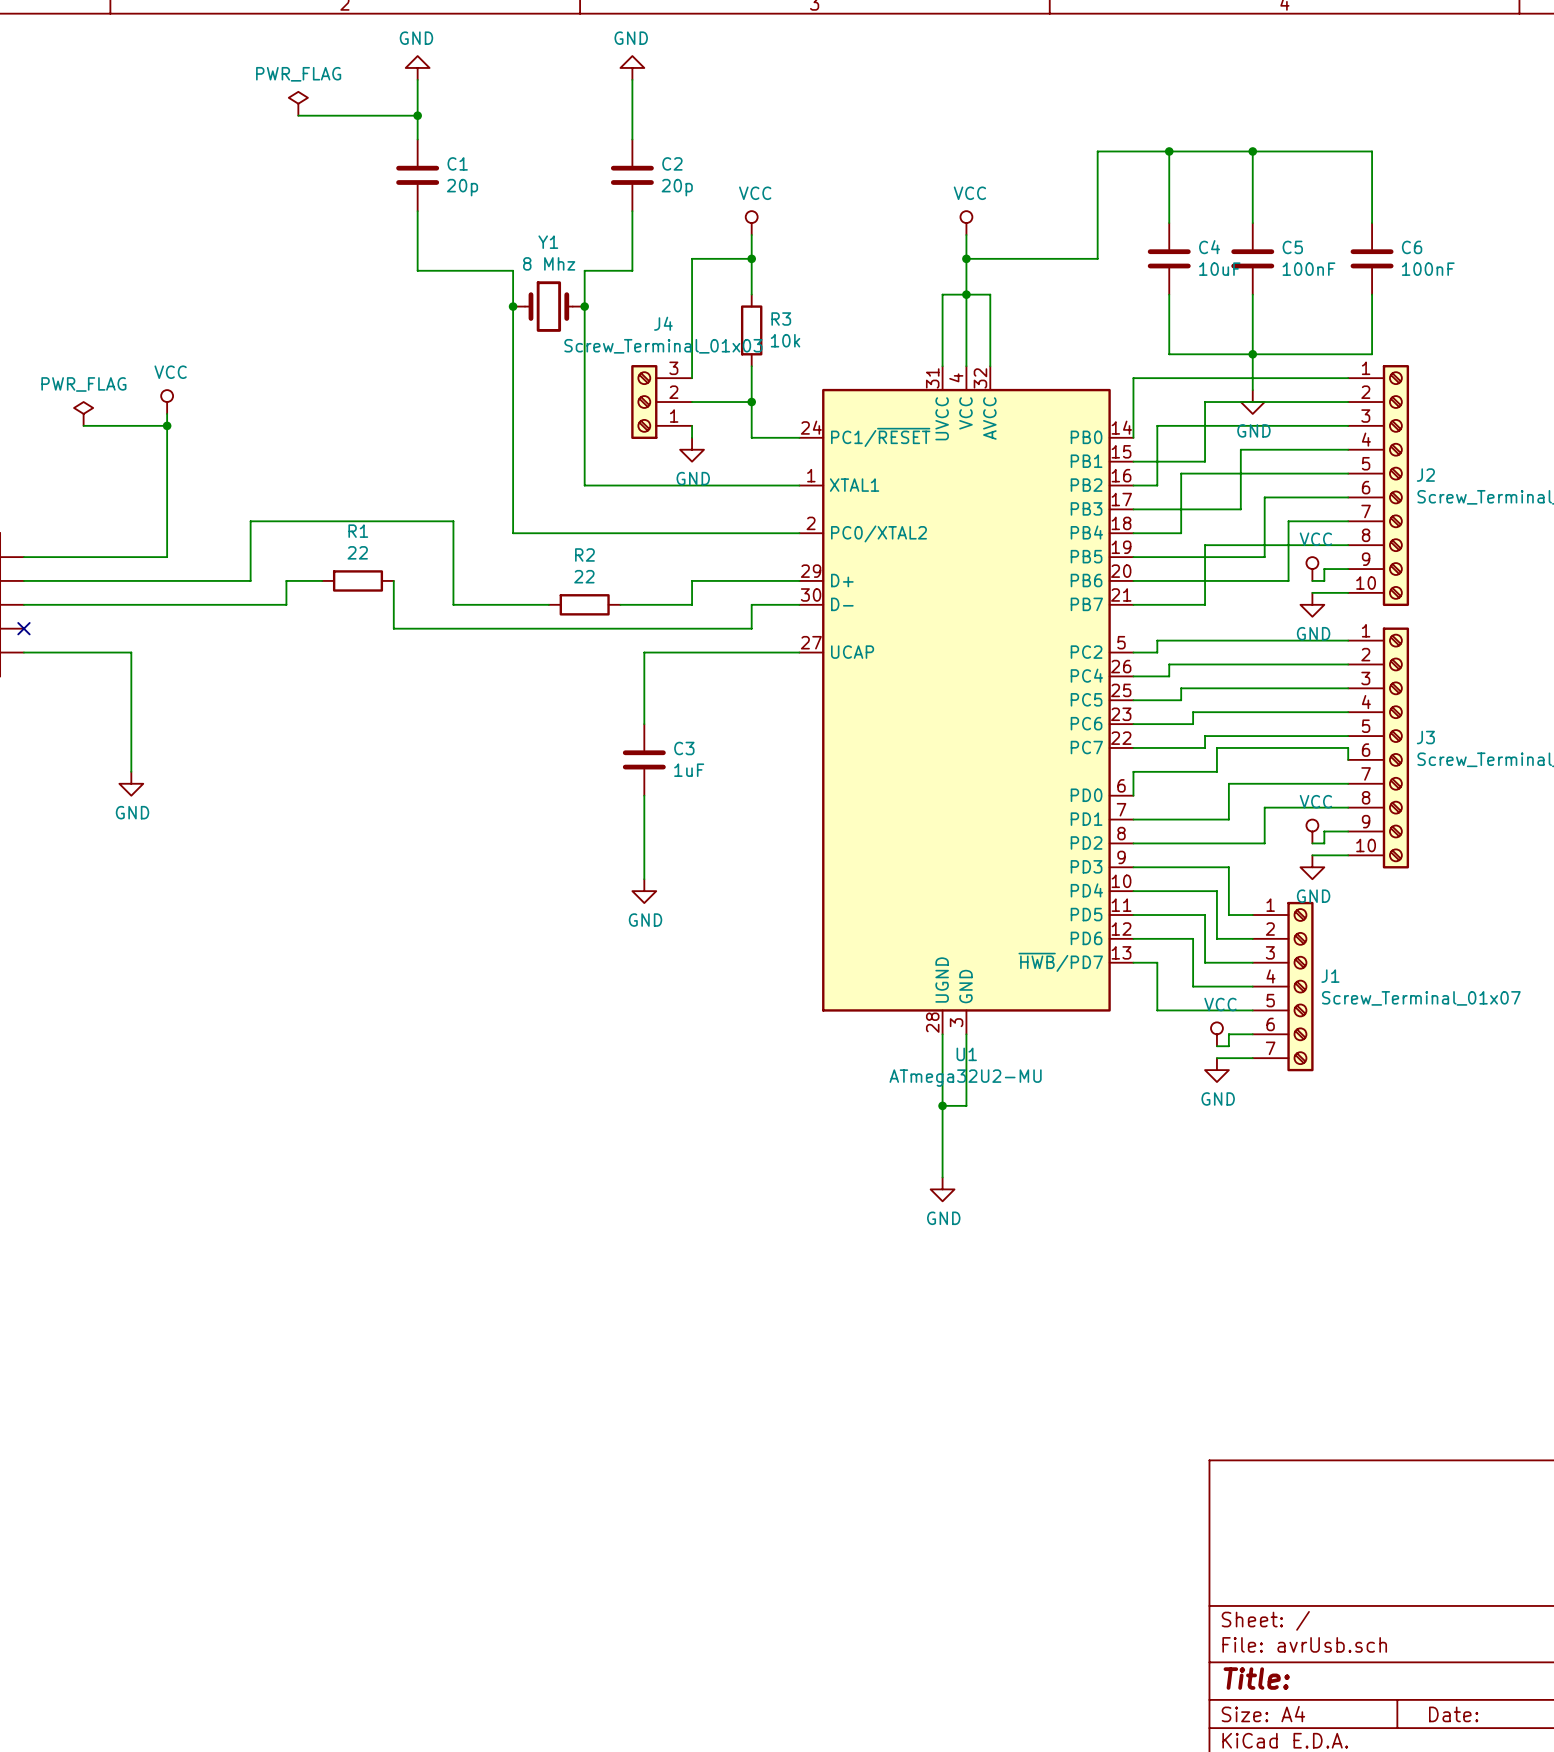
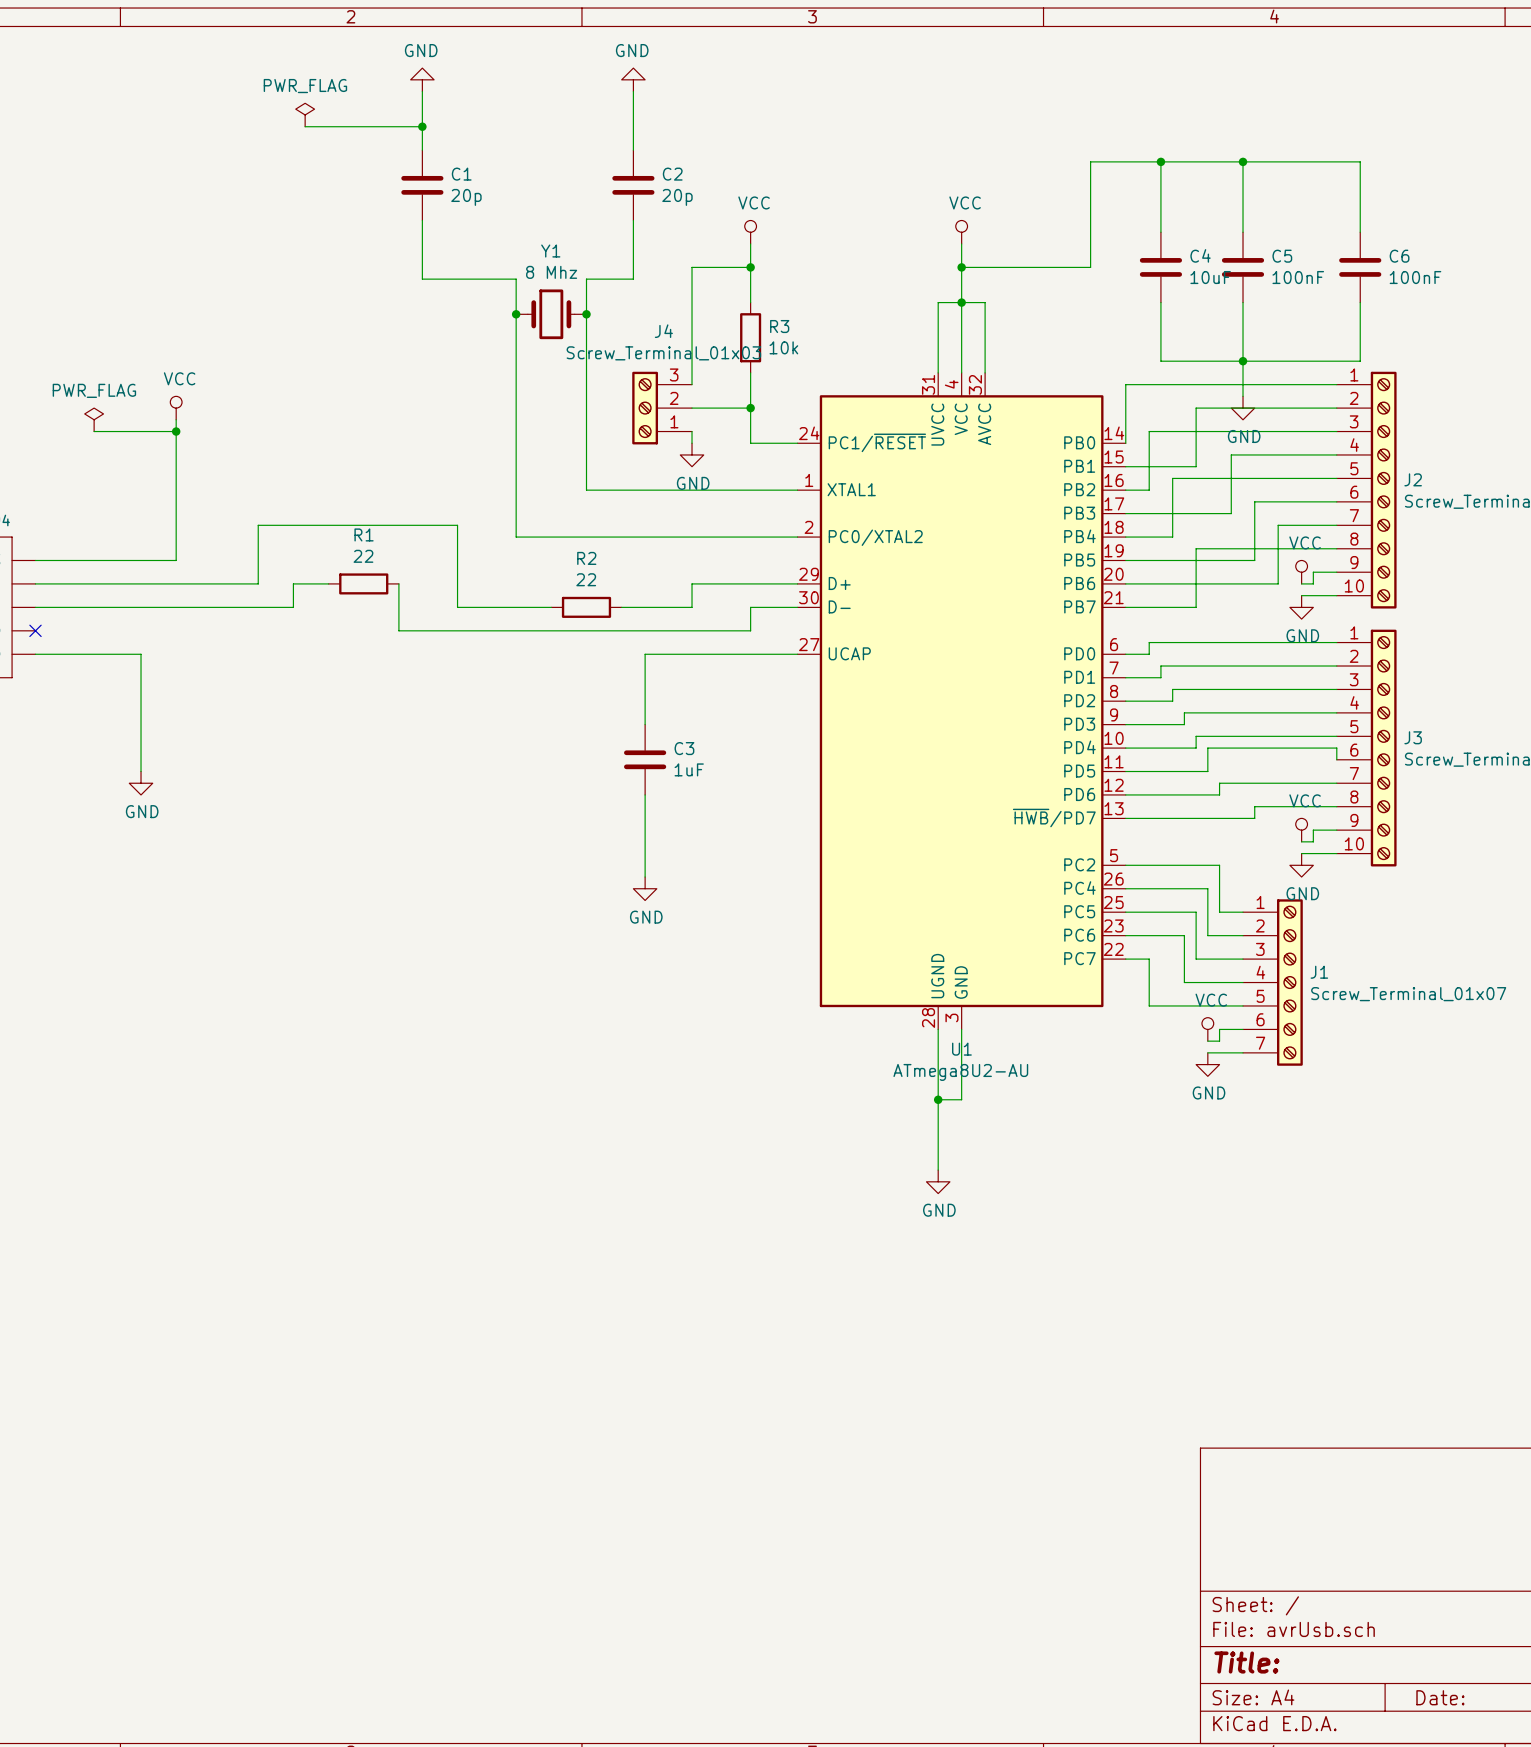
U1 symbol: [799, 366, 1134, 1035] -> [797, 372, 1126, 1030]
wire: (1133, 771) (1133, 795) -> (1219, 794) (1125, 794)
wire: (1228, 795) (1228, 819) -> (1254, 818) (1219, 818)
wire: (1264, 819) (1264, 843) (1133, 843) -> none
U1 value: ATmega32U2-MU (965, 1078) -> ATmega8U2-AU (960, 1072)

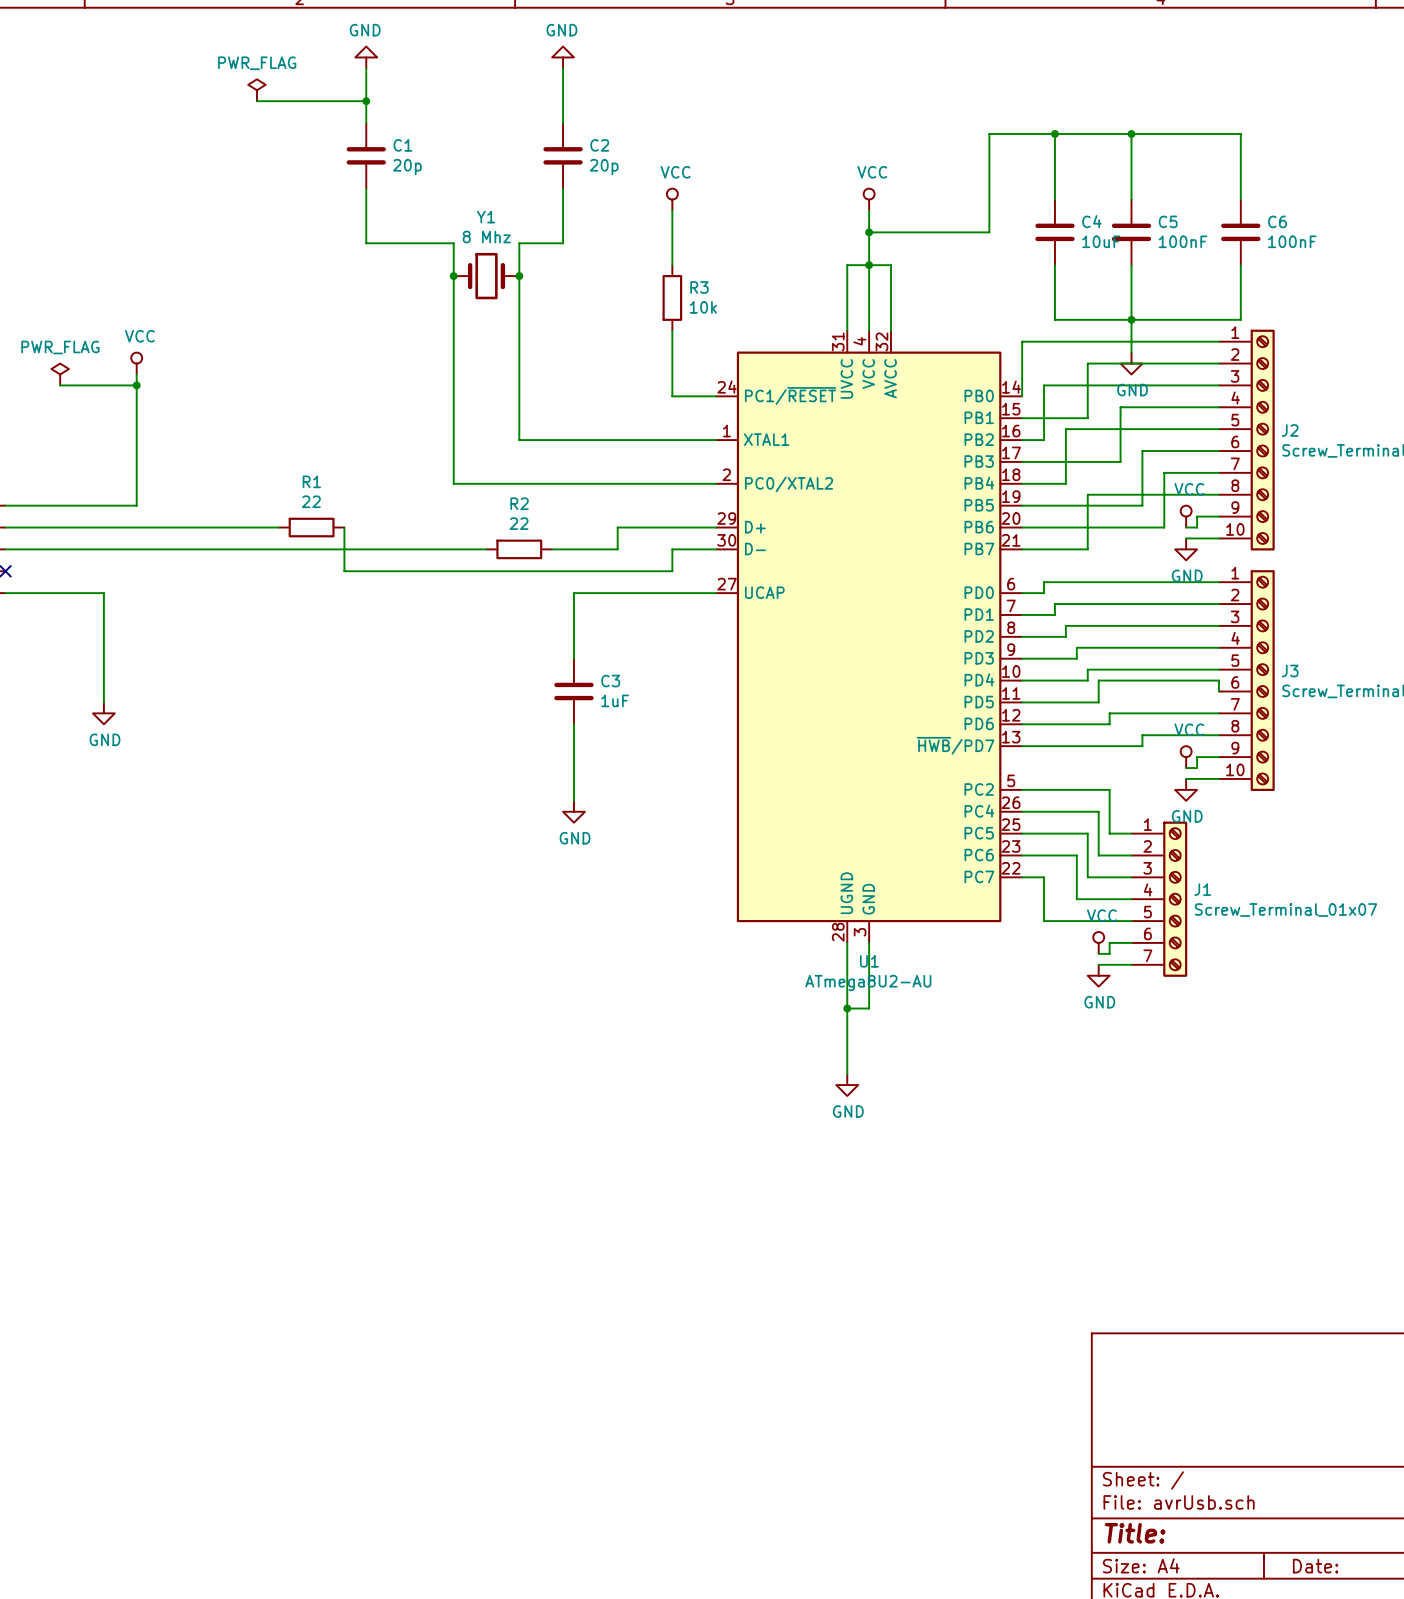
wire: (750, 267) (692, 267) (692, 384) -> none
junction: (750, 267) -> none
J4: Screw_Terminal_01x03 (662, 408) -> none
wire: (692, 408) (750, 408) -> none
junction: (750, 408) -> none
wire: (692, 431) (692, 443) -> none
power symbol: GND (692, 454) -> none
wire: (258, 583) (258, 525) (457, 525) (457, 607) -> (246, 549) (399, 549)
wire: (293, 583) (293, 607) -> (246, 527) (213, 527)

